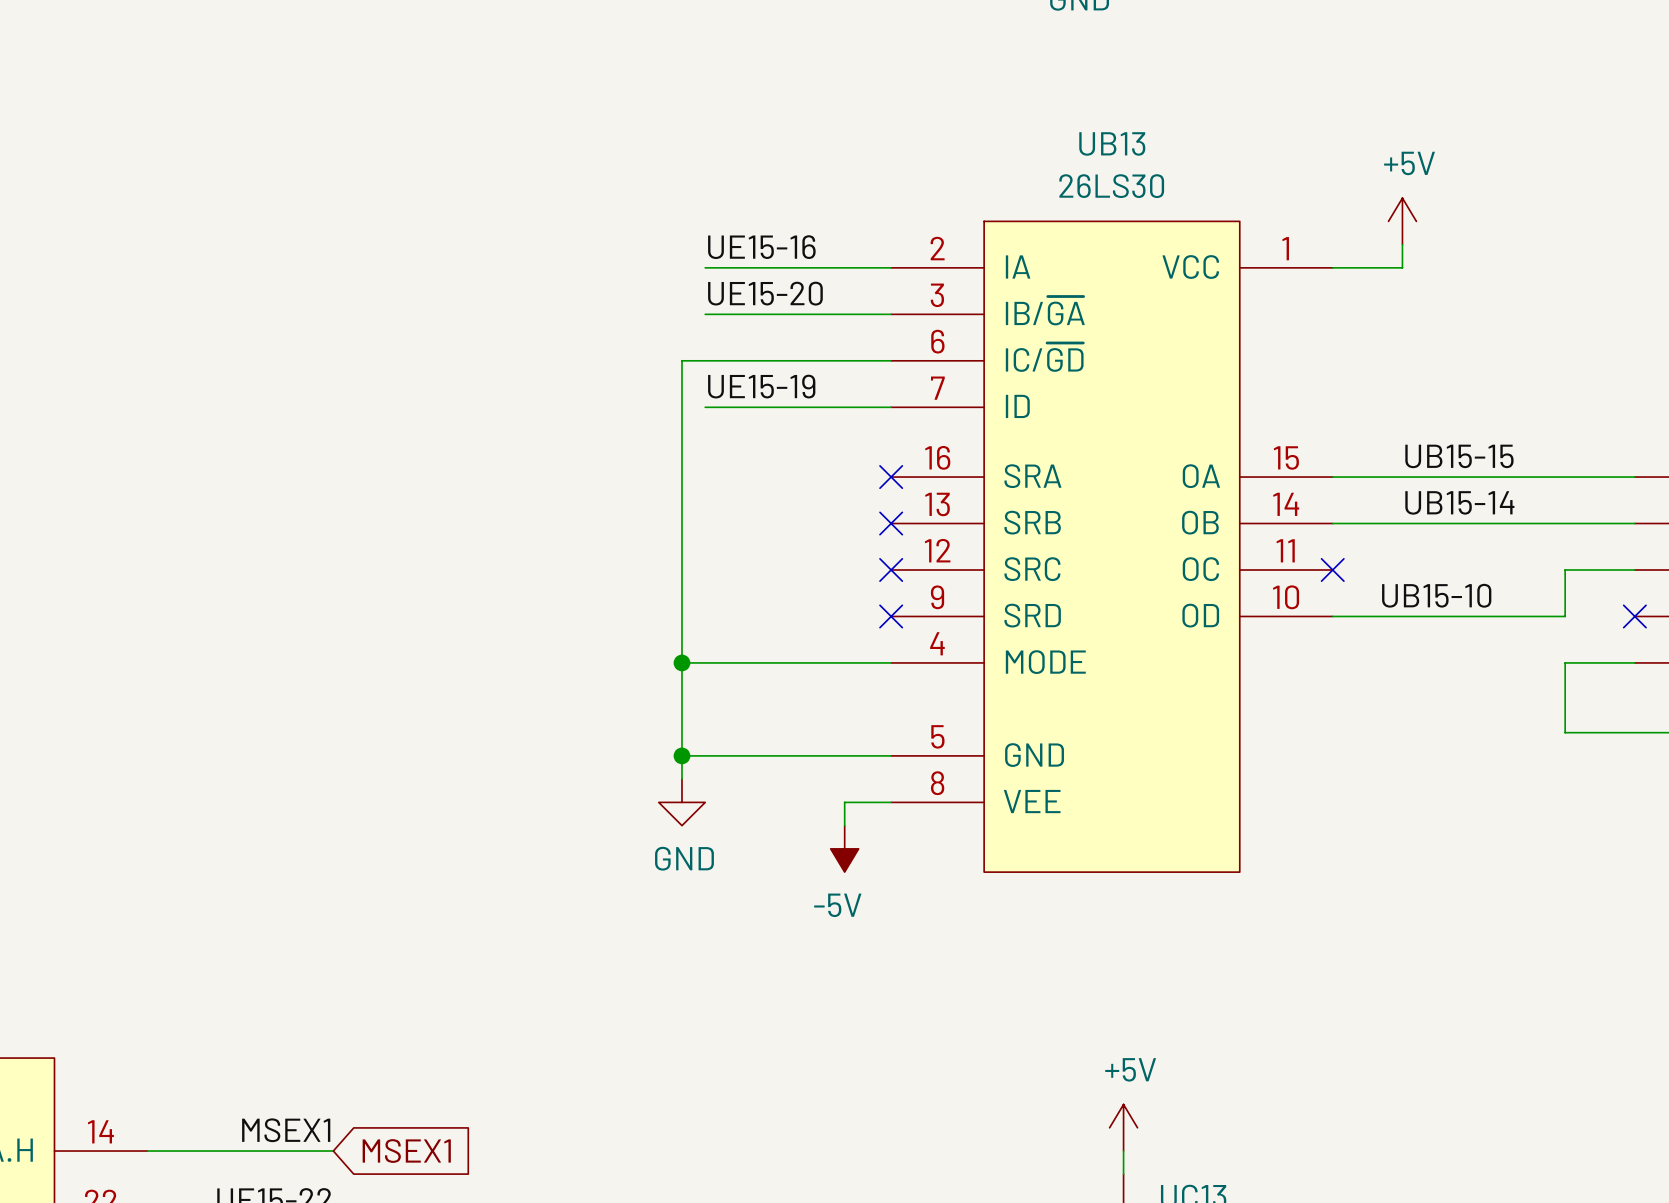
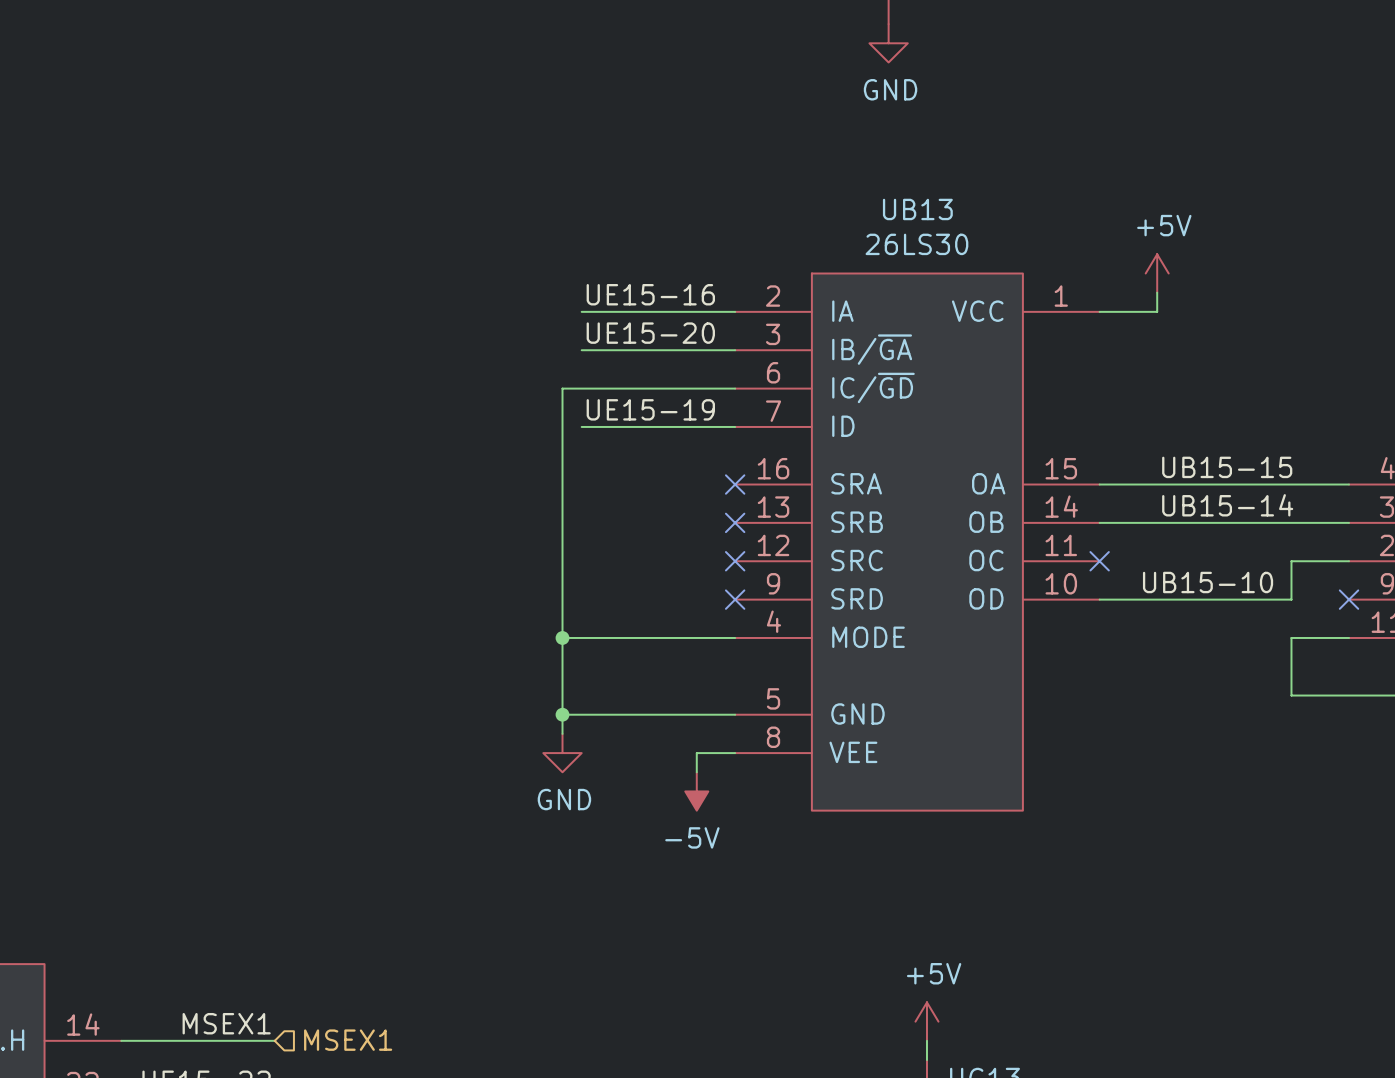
hierarchical label: none -> MSEX1 (348, 1040)
global label: MSEX1 (406, 1151) -> none

